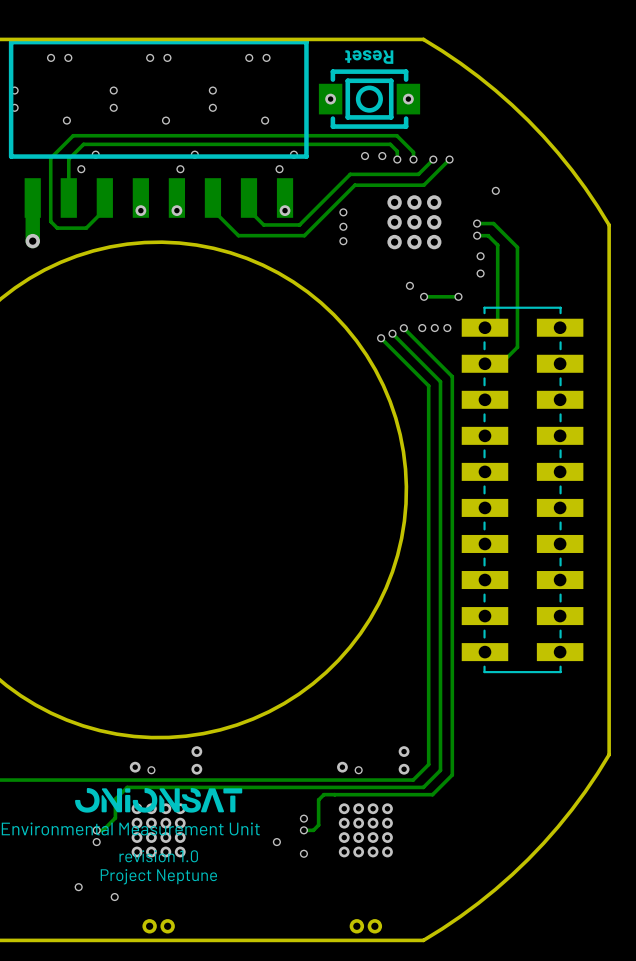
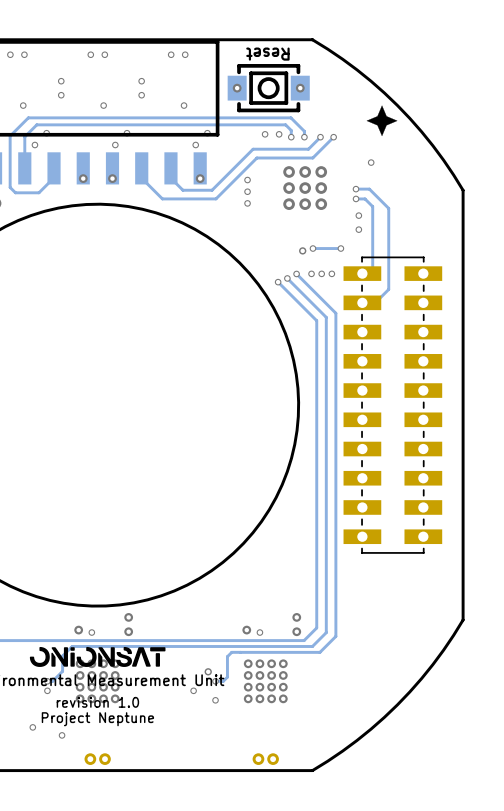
drawing: none -> [366, 105, 398, 137]
via: (409, 285) -> none
via: none -> (302, 250)
via: none -> (208, 671)
via: (303, 818) -> none

